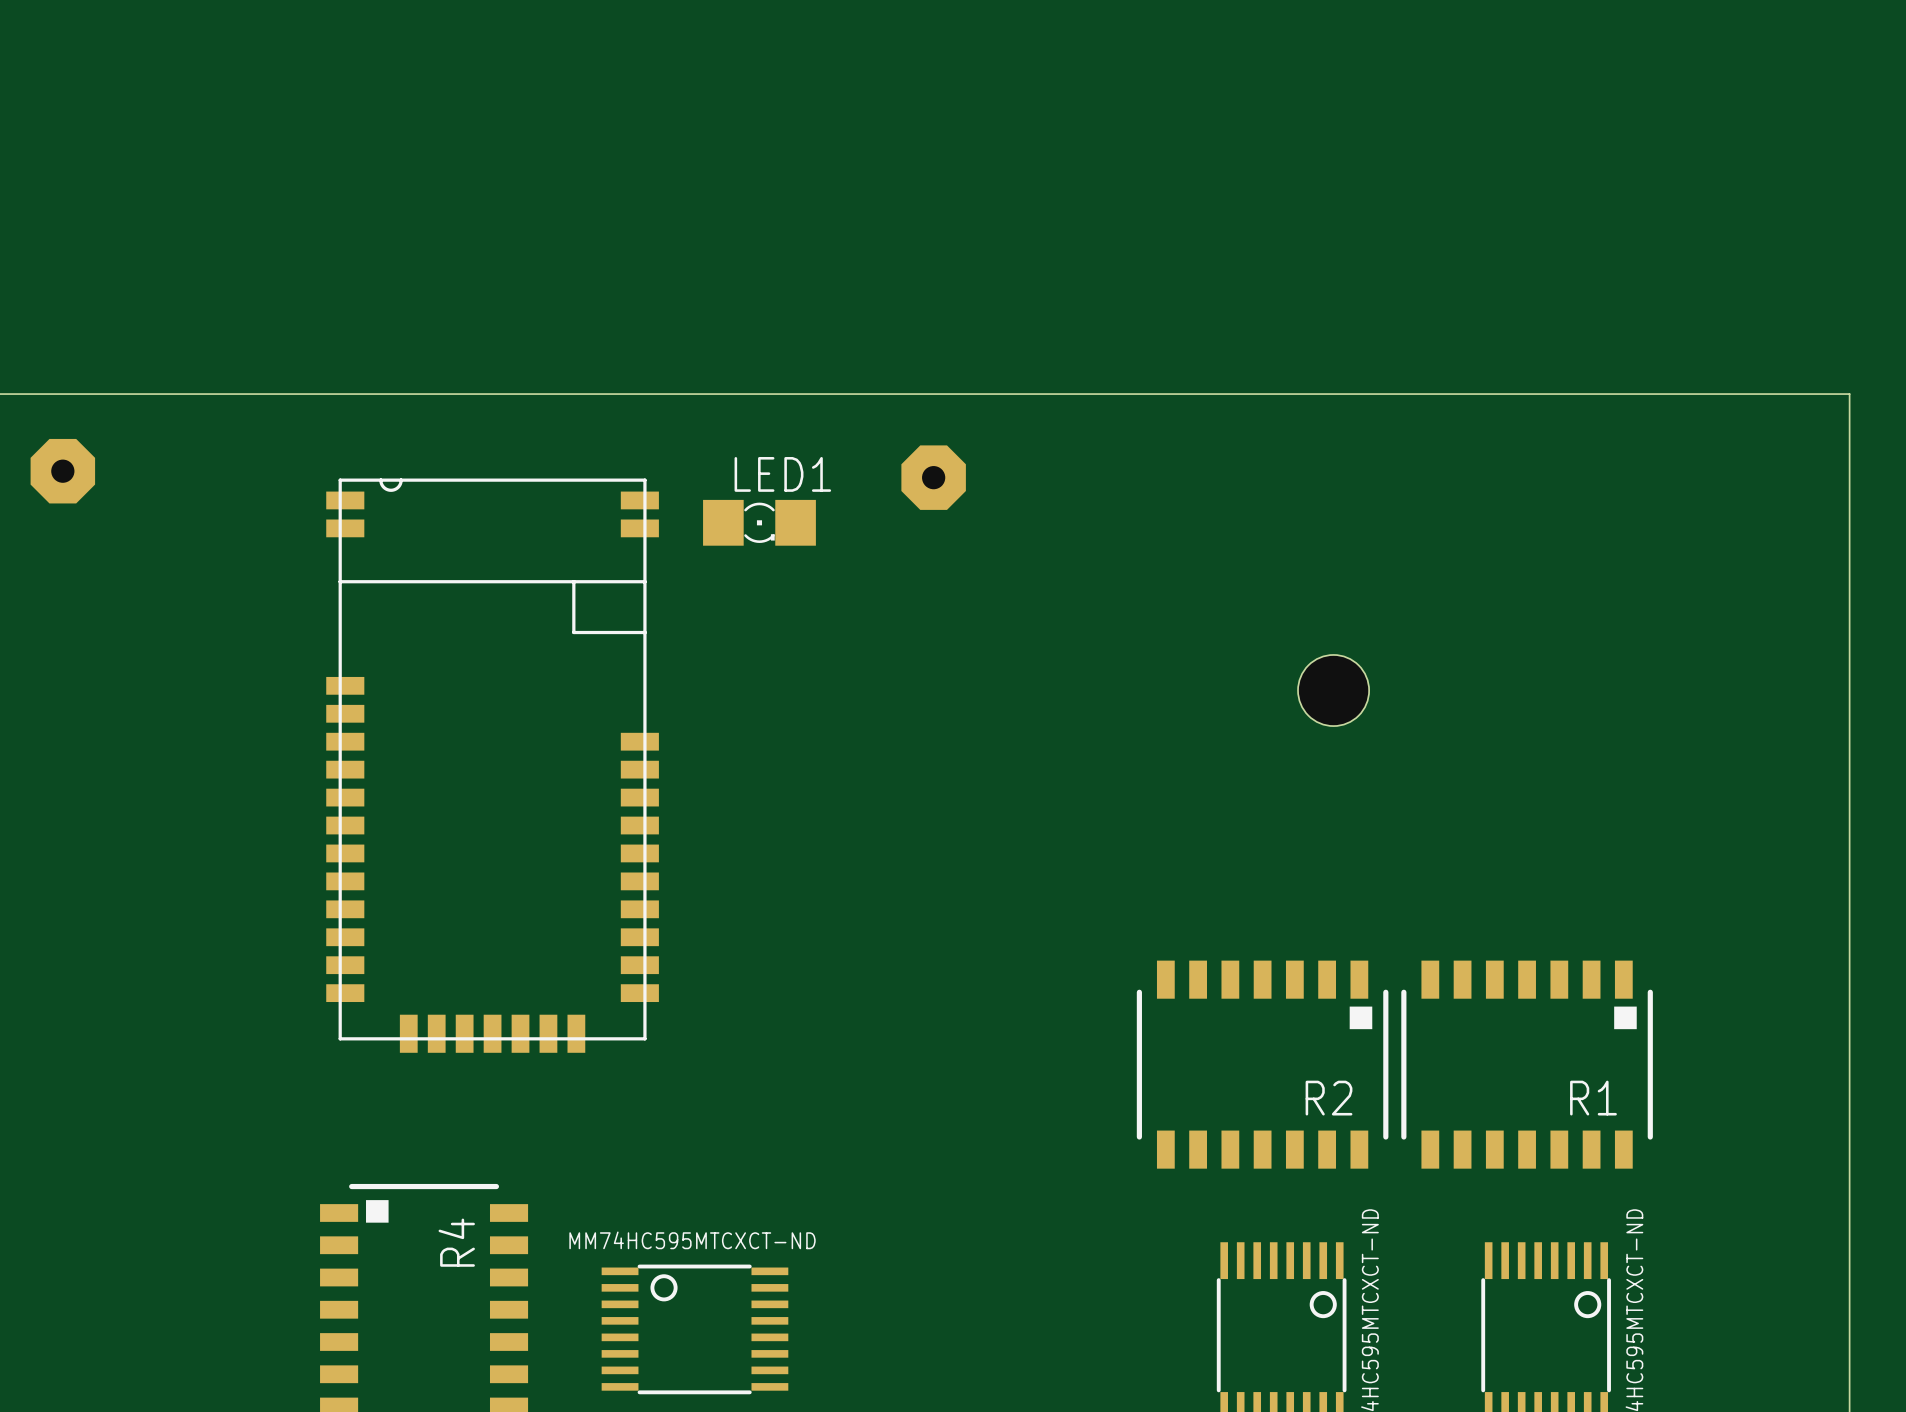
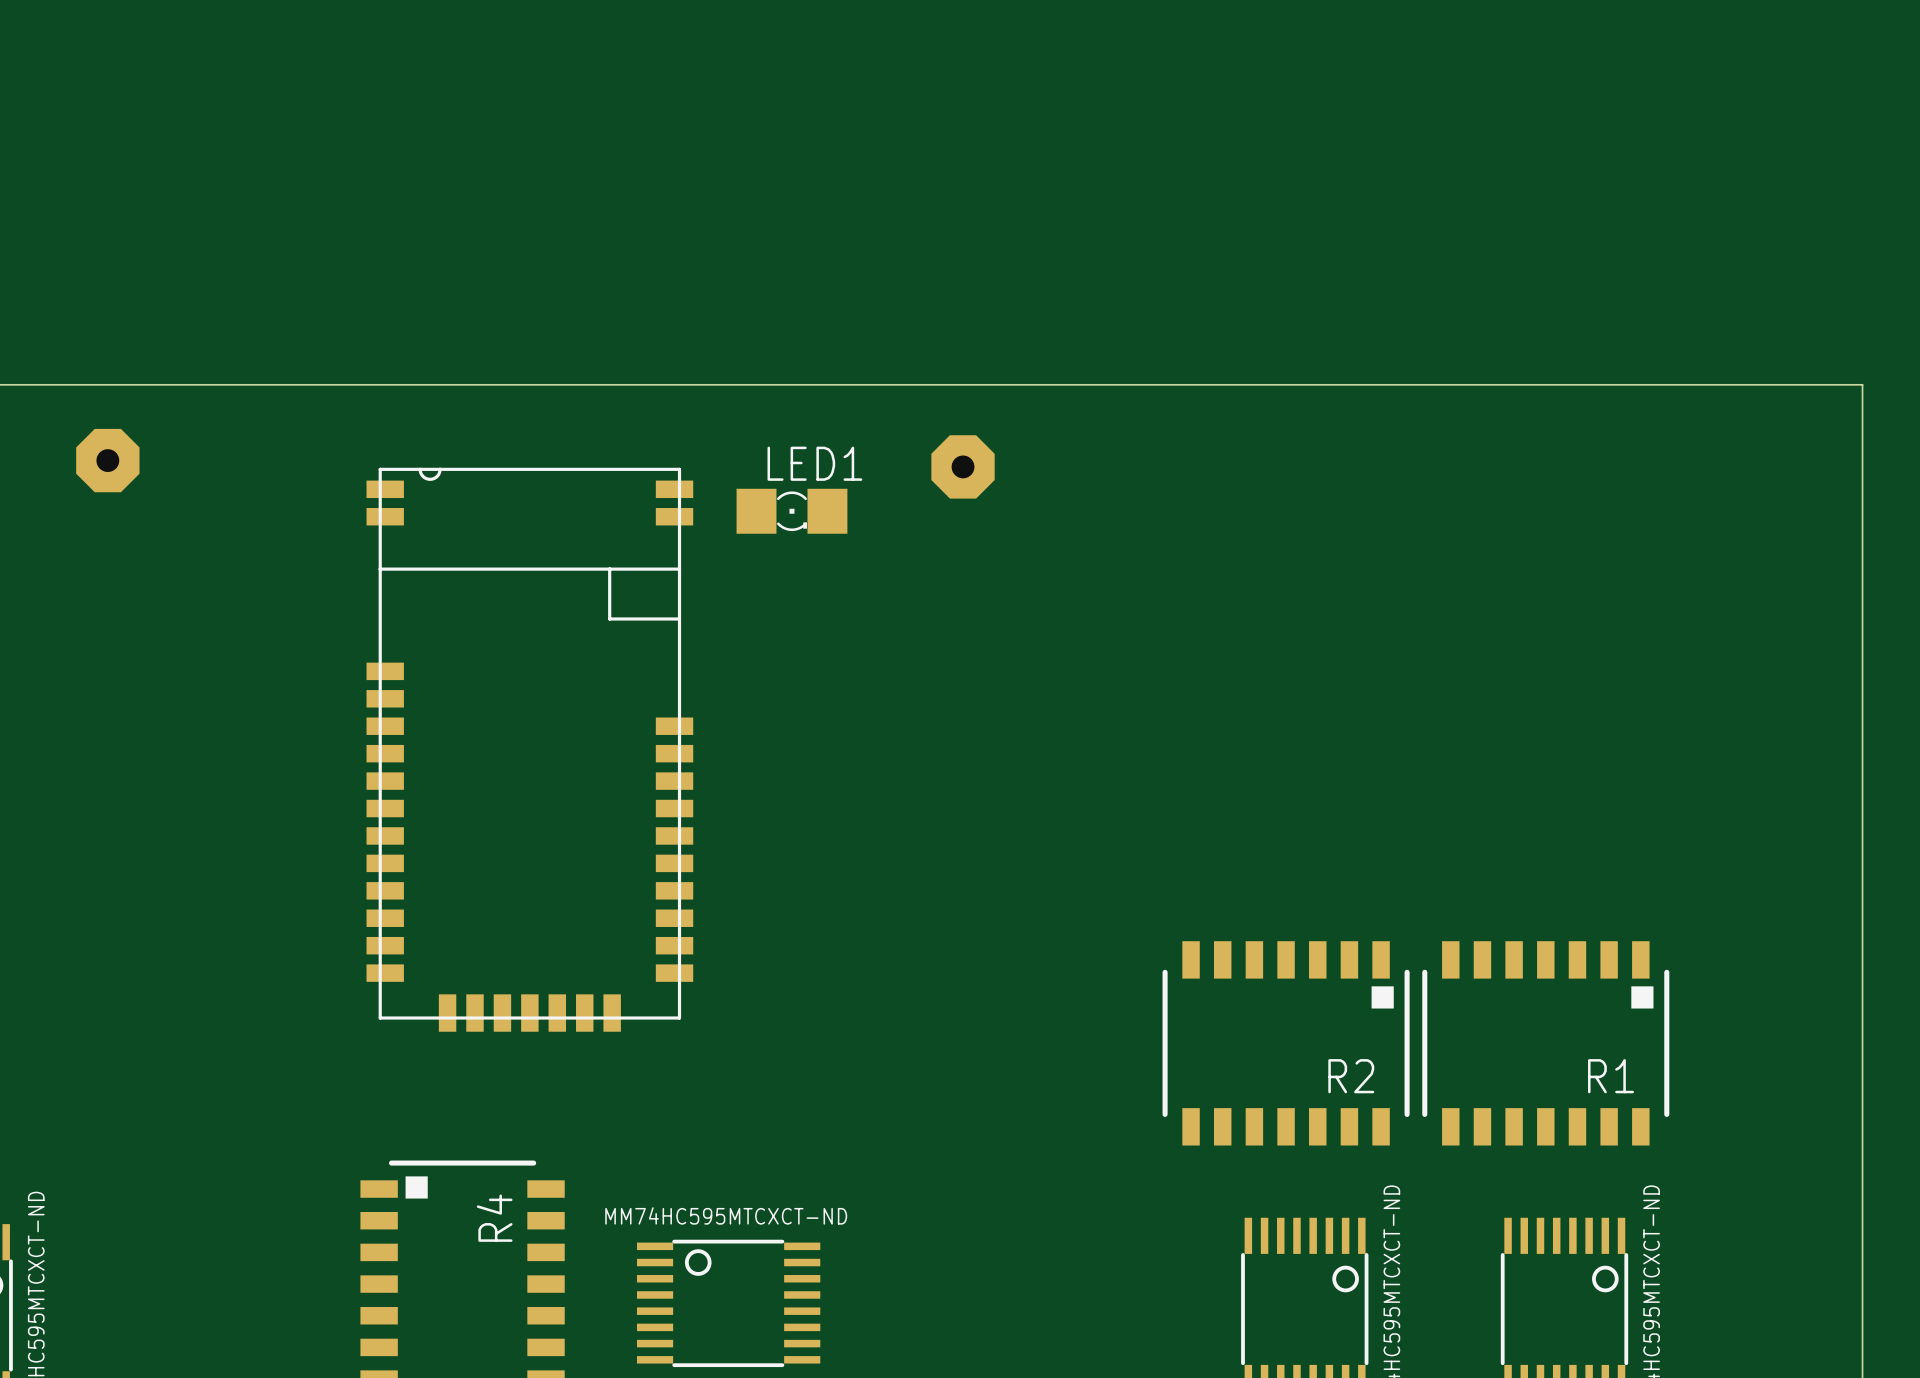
part: (1333, 690) -> none

